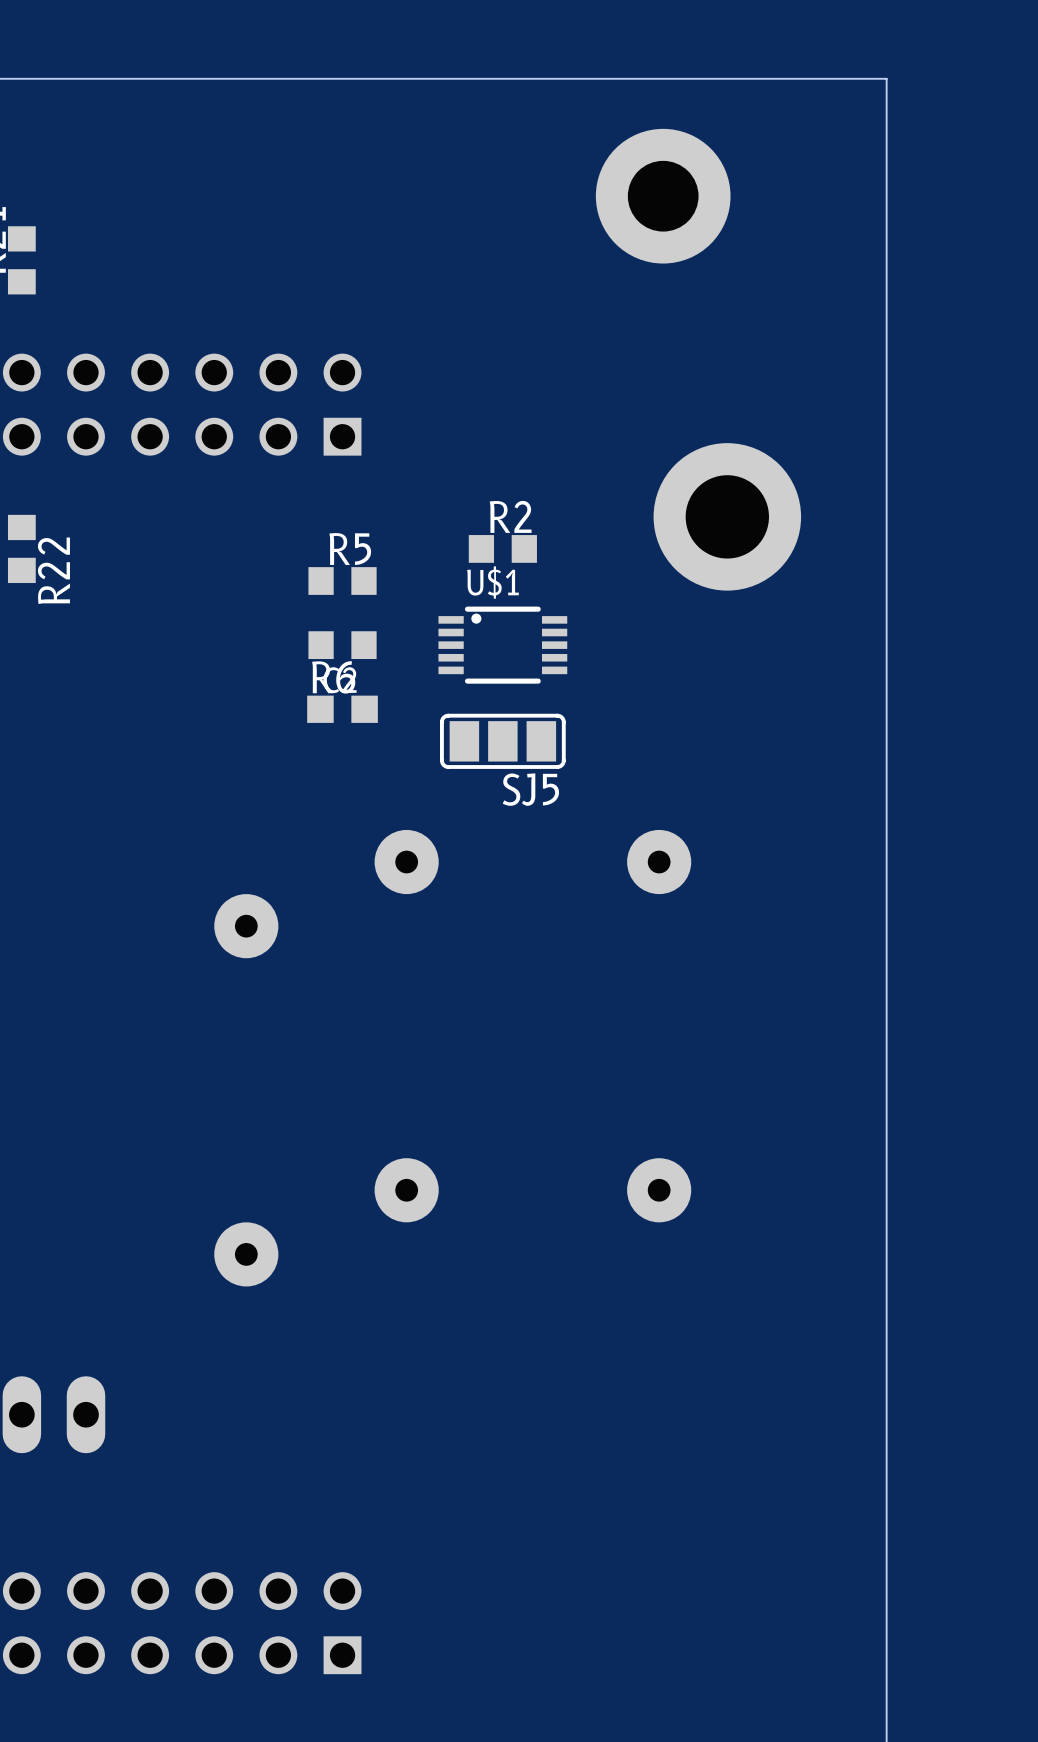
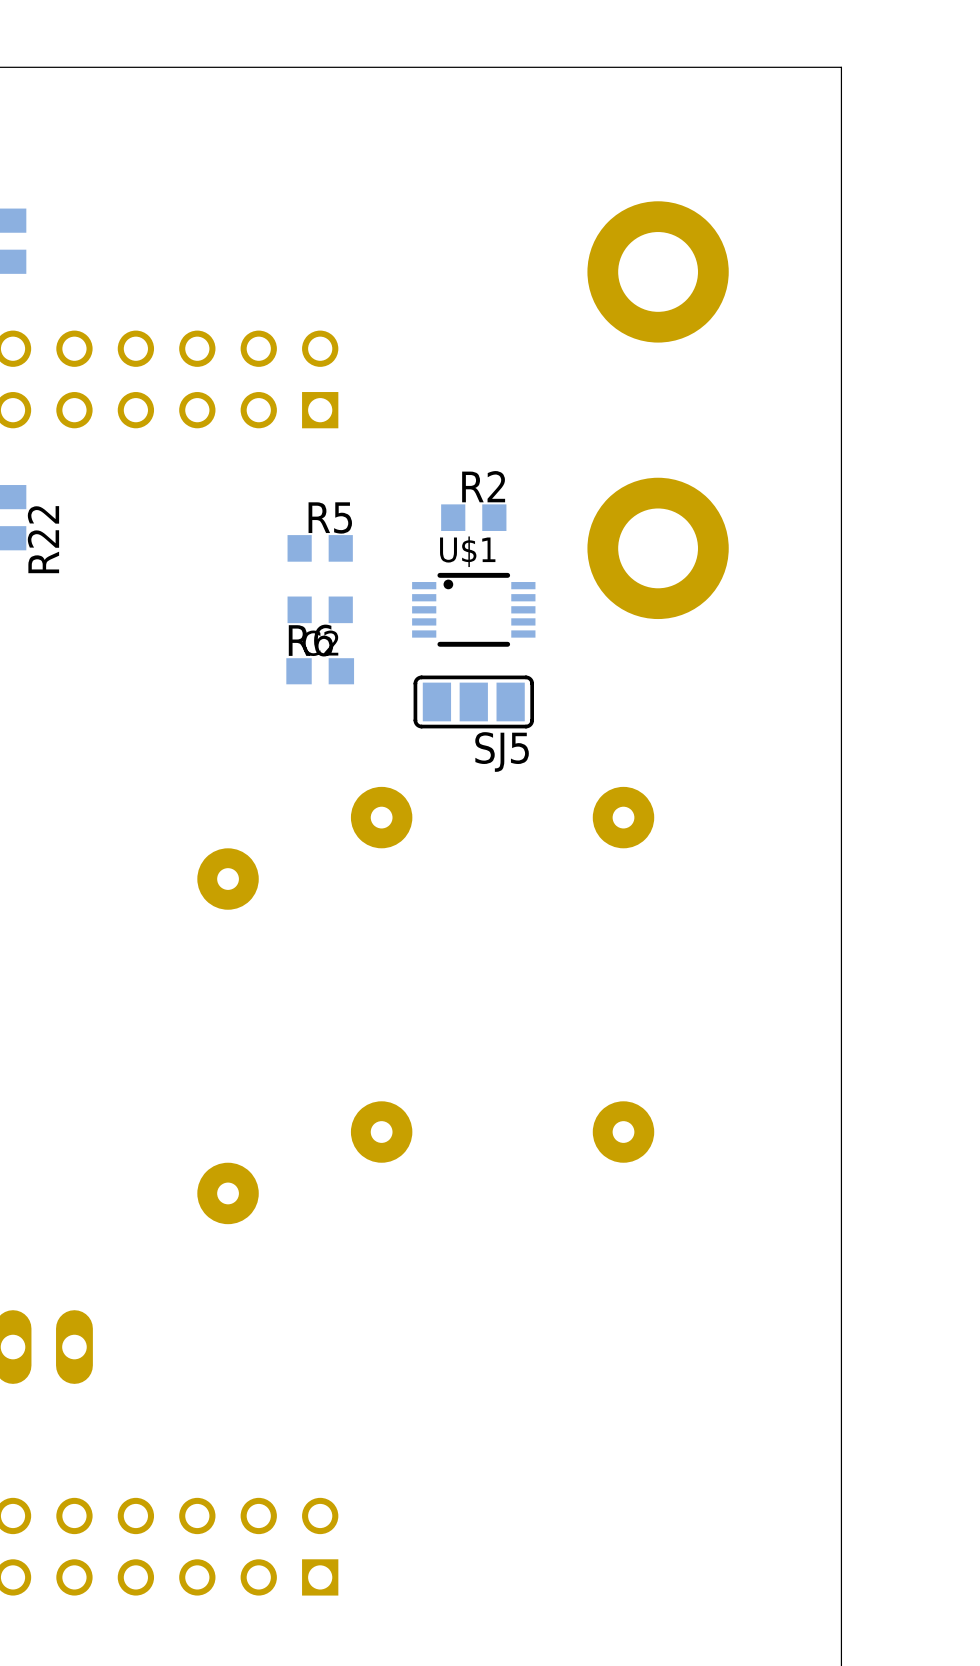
part: (663, 196) -> none
part: none -> (658, 271)
part position: (727, 516) -> (658, 548)

